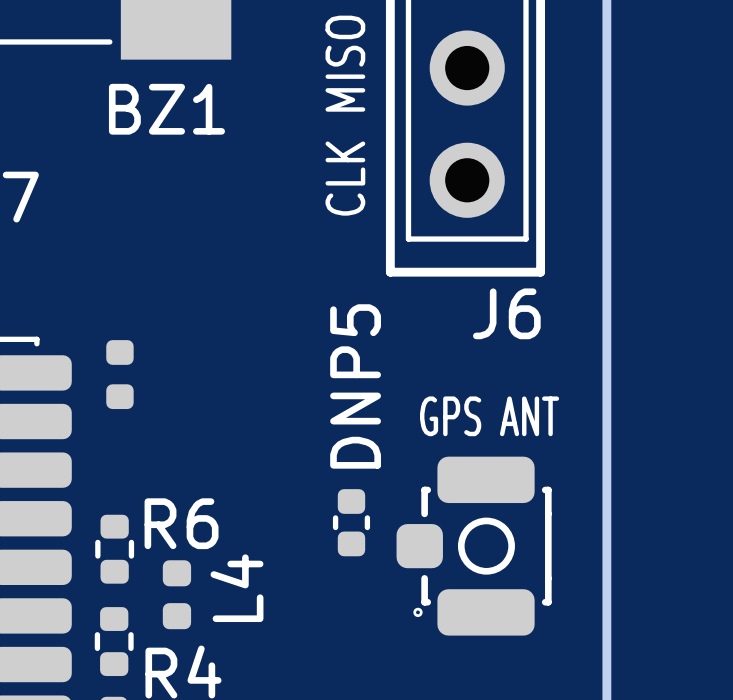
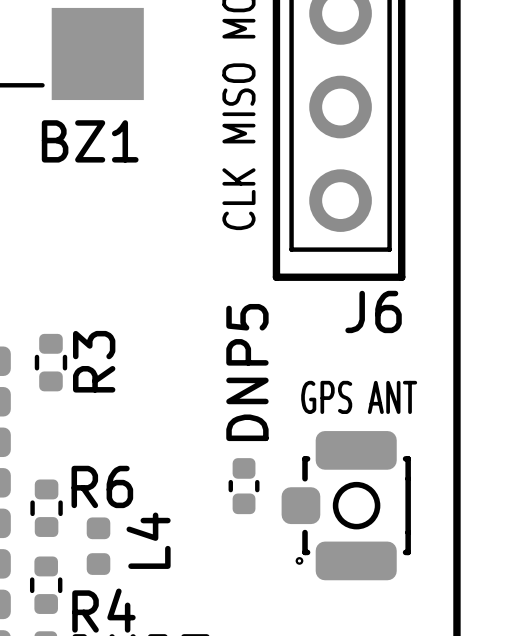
part: (119, 374) -> none
R3: none -> (50, 362)

